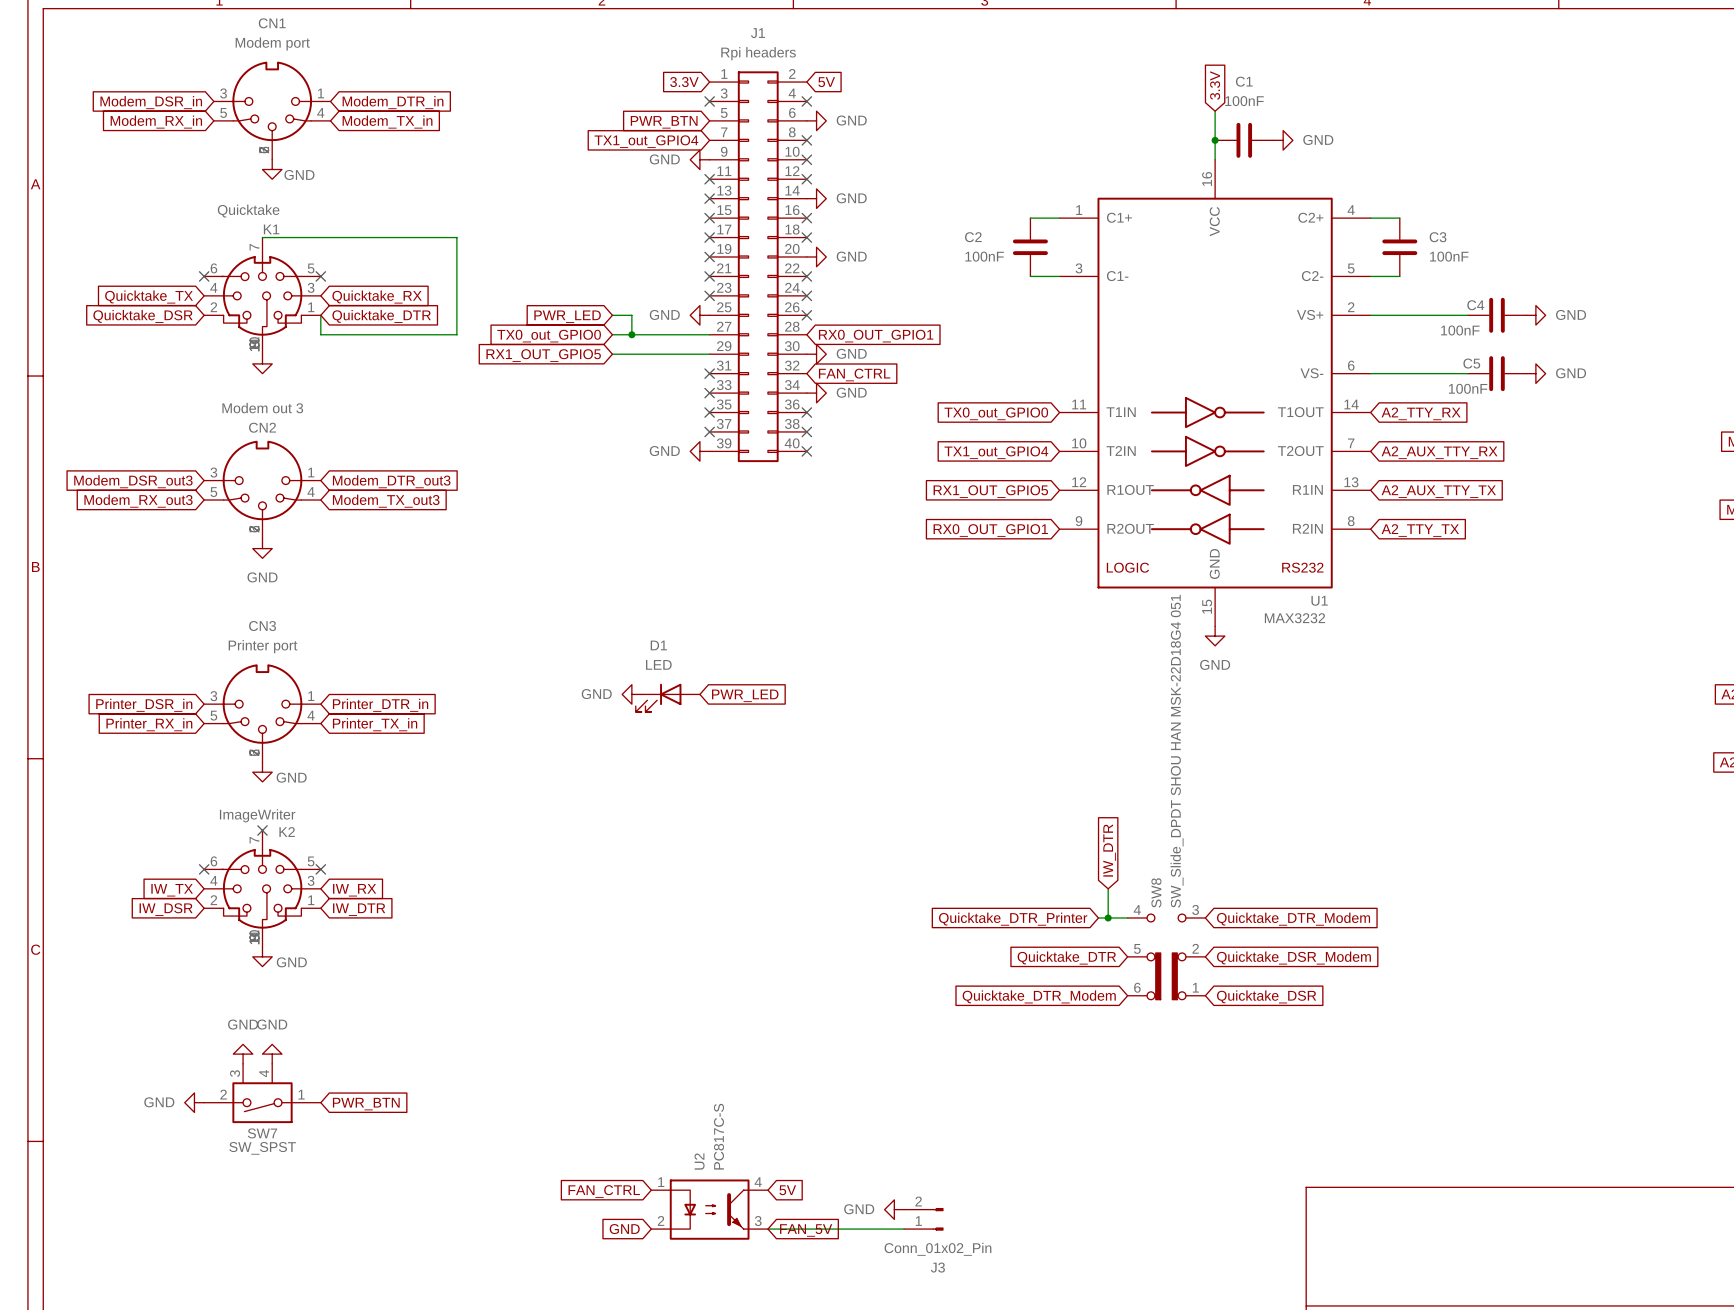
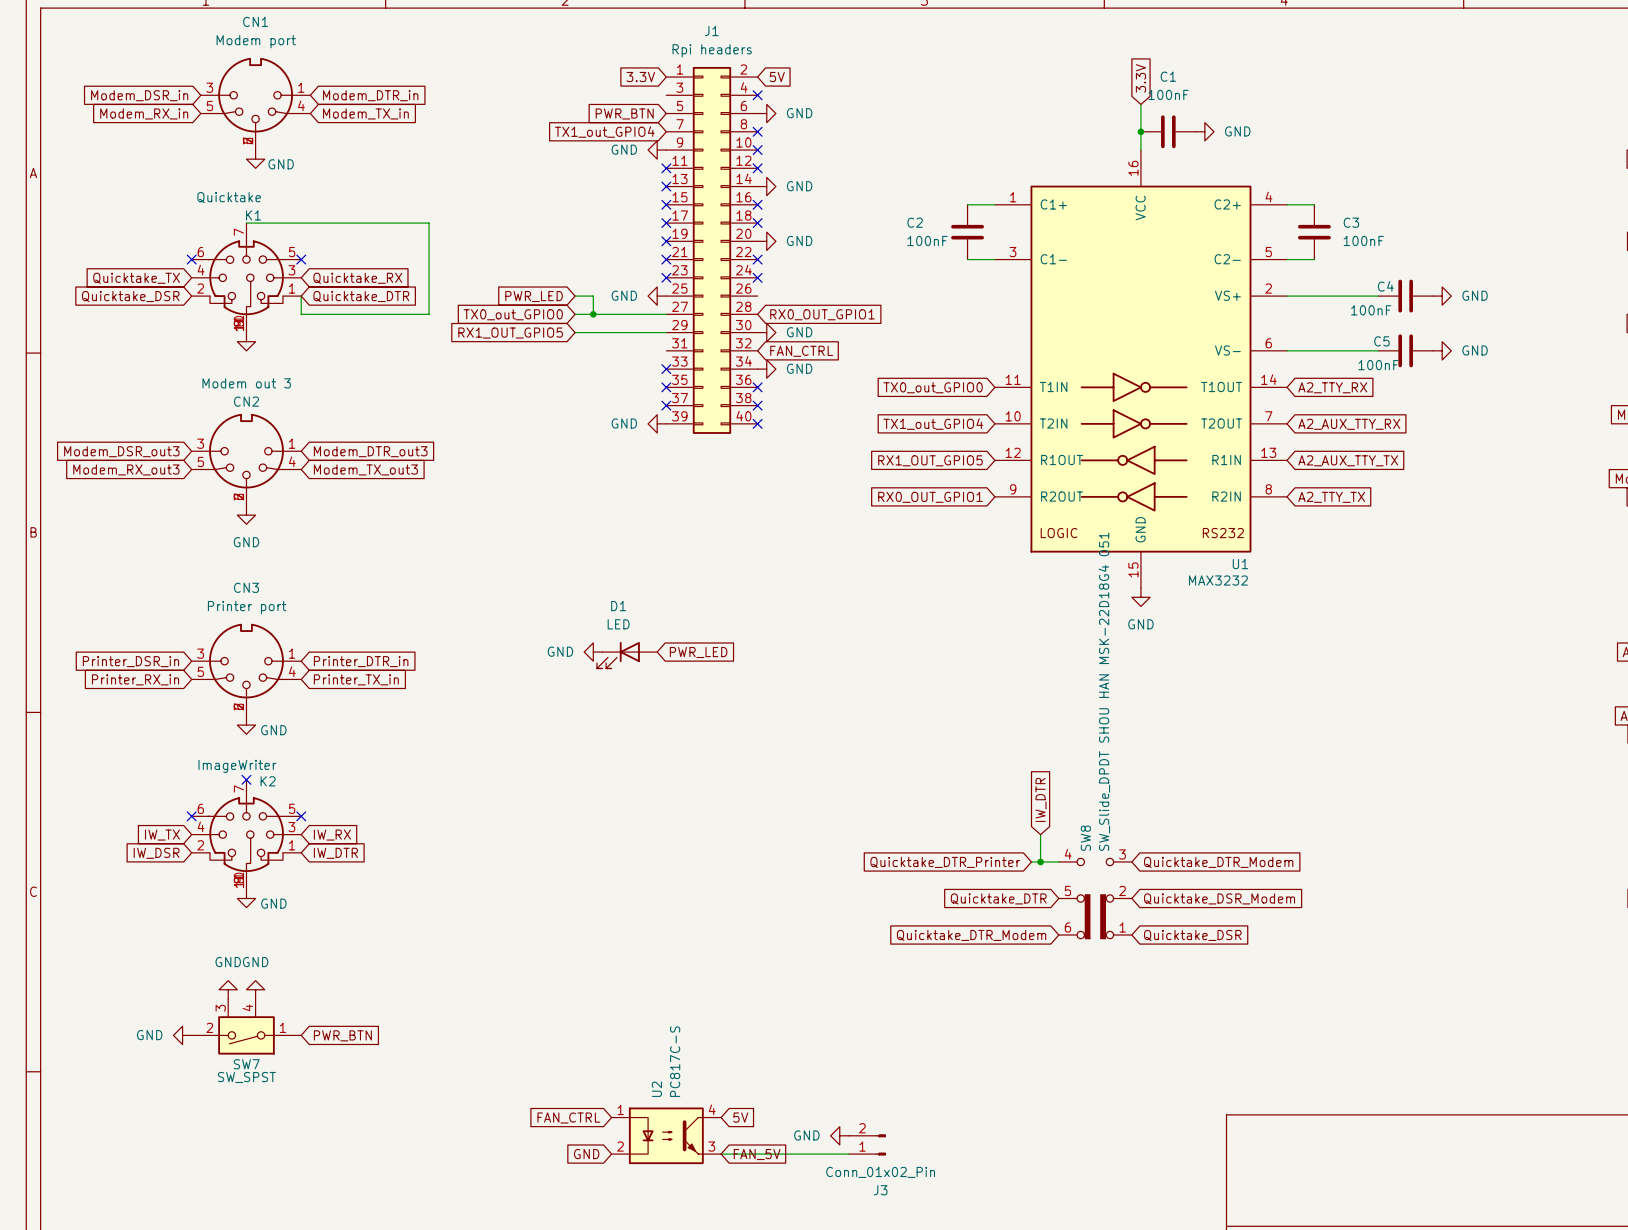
no-connect mark: (709, 101) -> none
no-connect mark: (806, 315) -> none
no-connect mark: (709, 373) -> none

